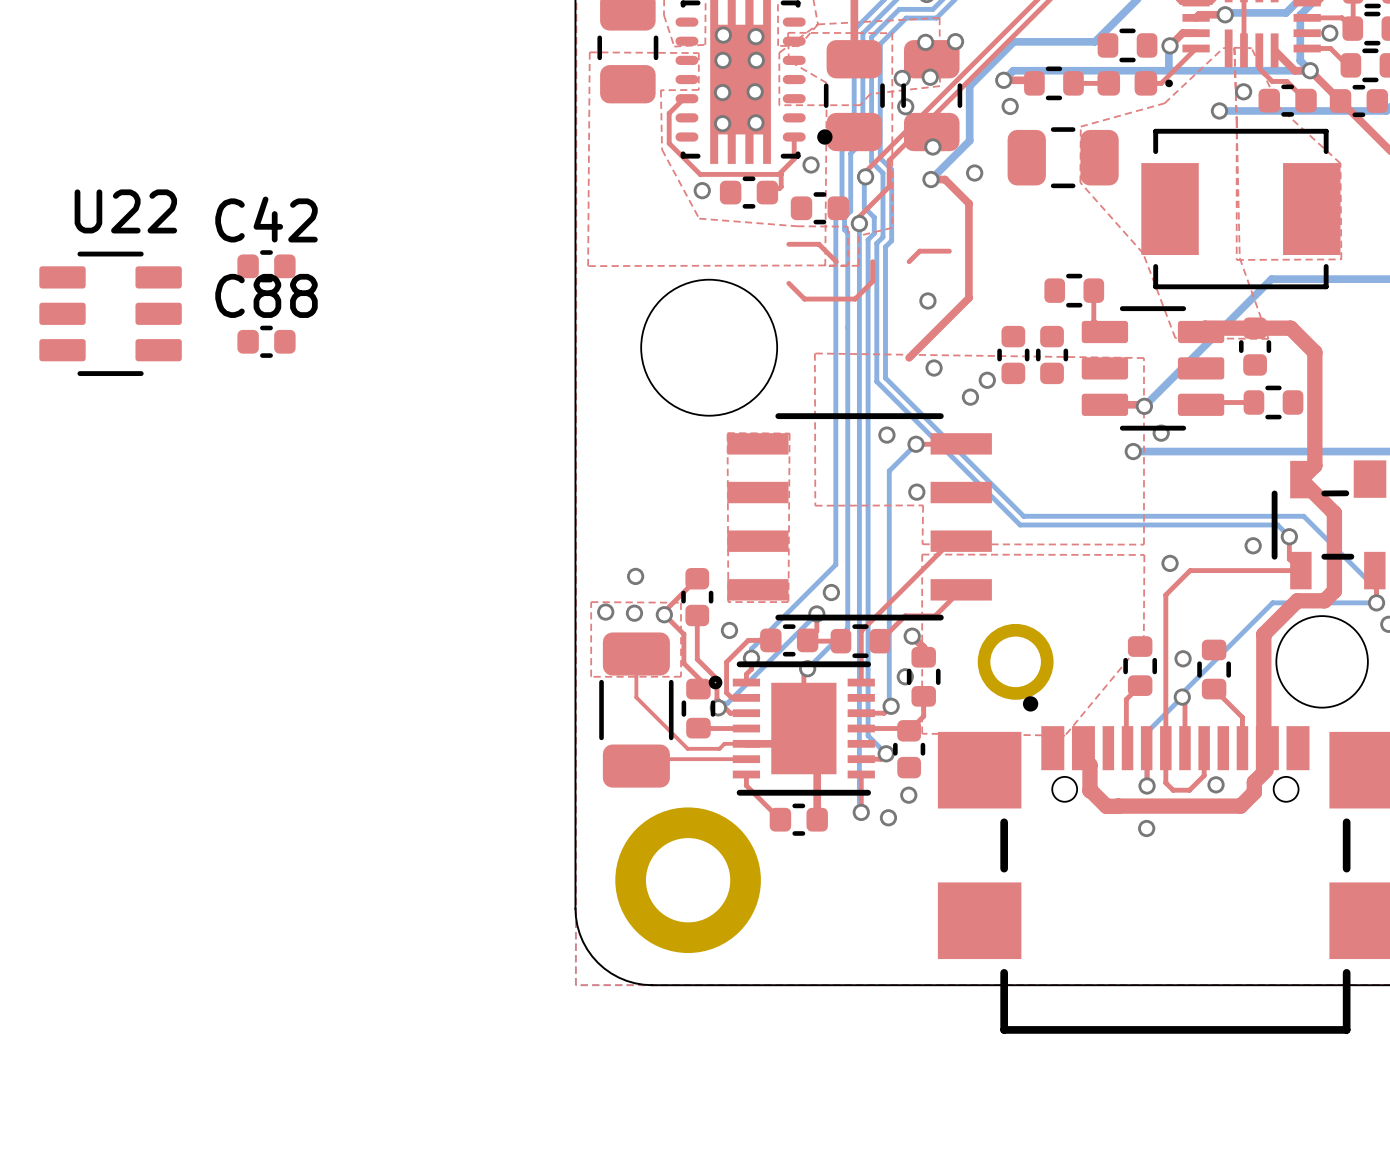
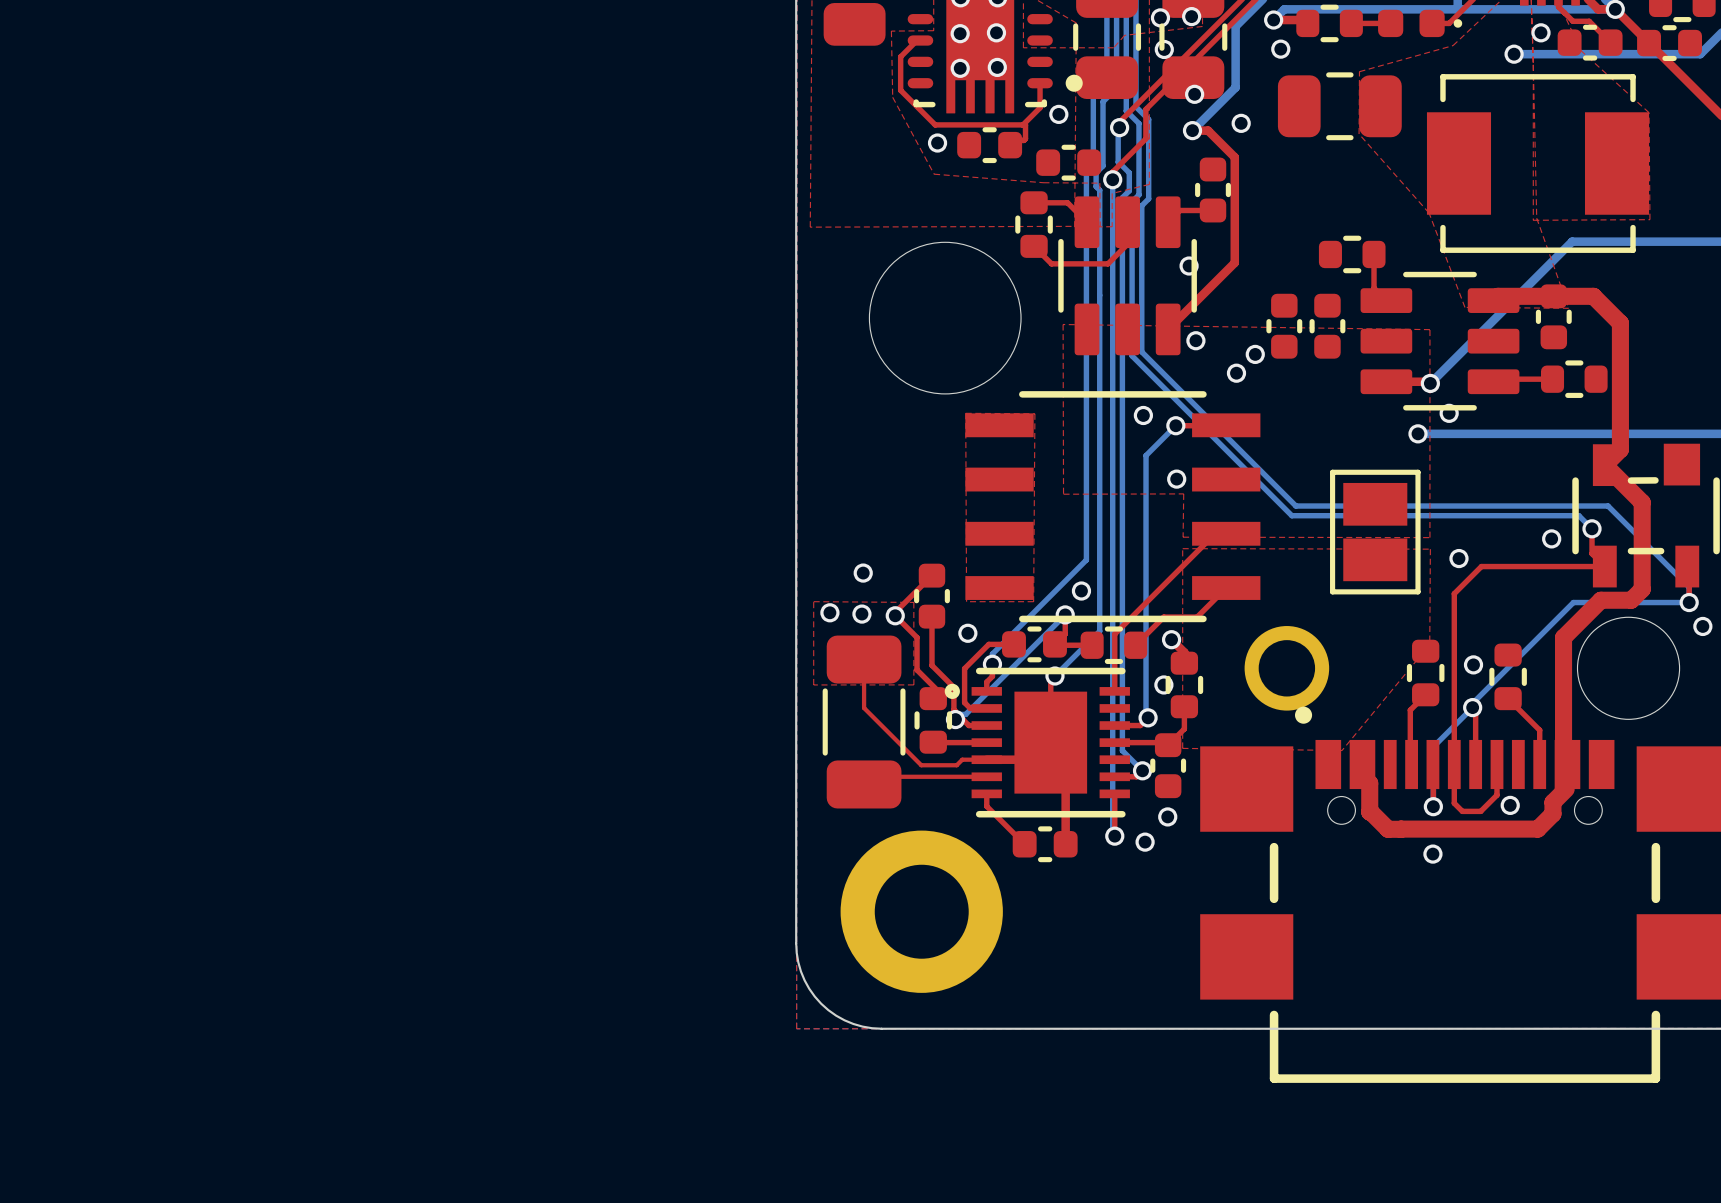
part: none -> (1213, 189)
part: none -> (1034, 224)
C42: (266, 266) -> none
part: none -> (1127, 275)
U22: (110, 313) -> none
C88: (266, 341) -> none
part: none -> (1375, 532)

